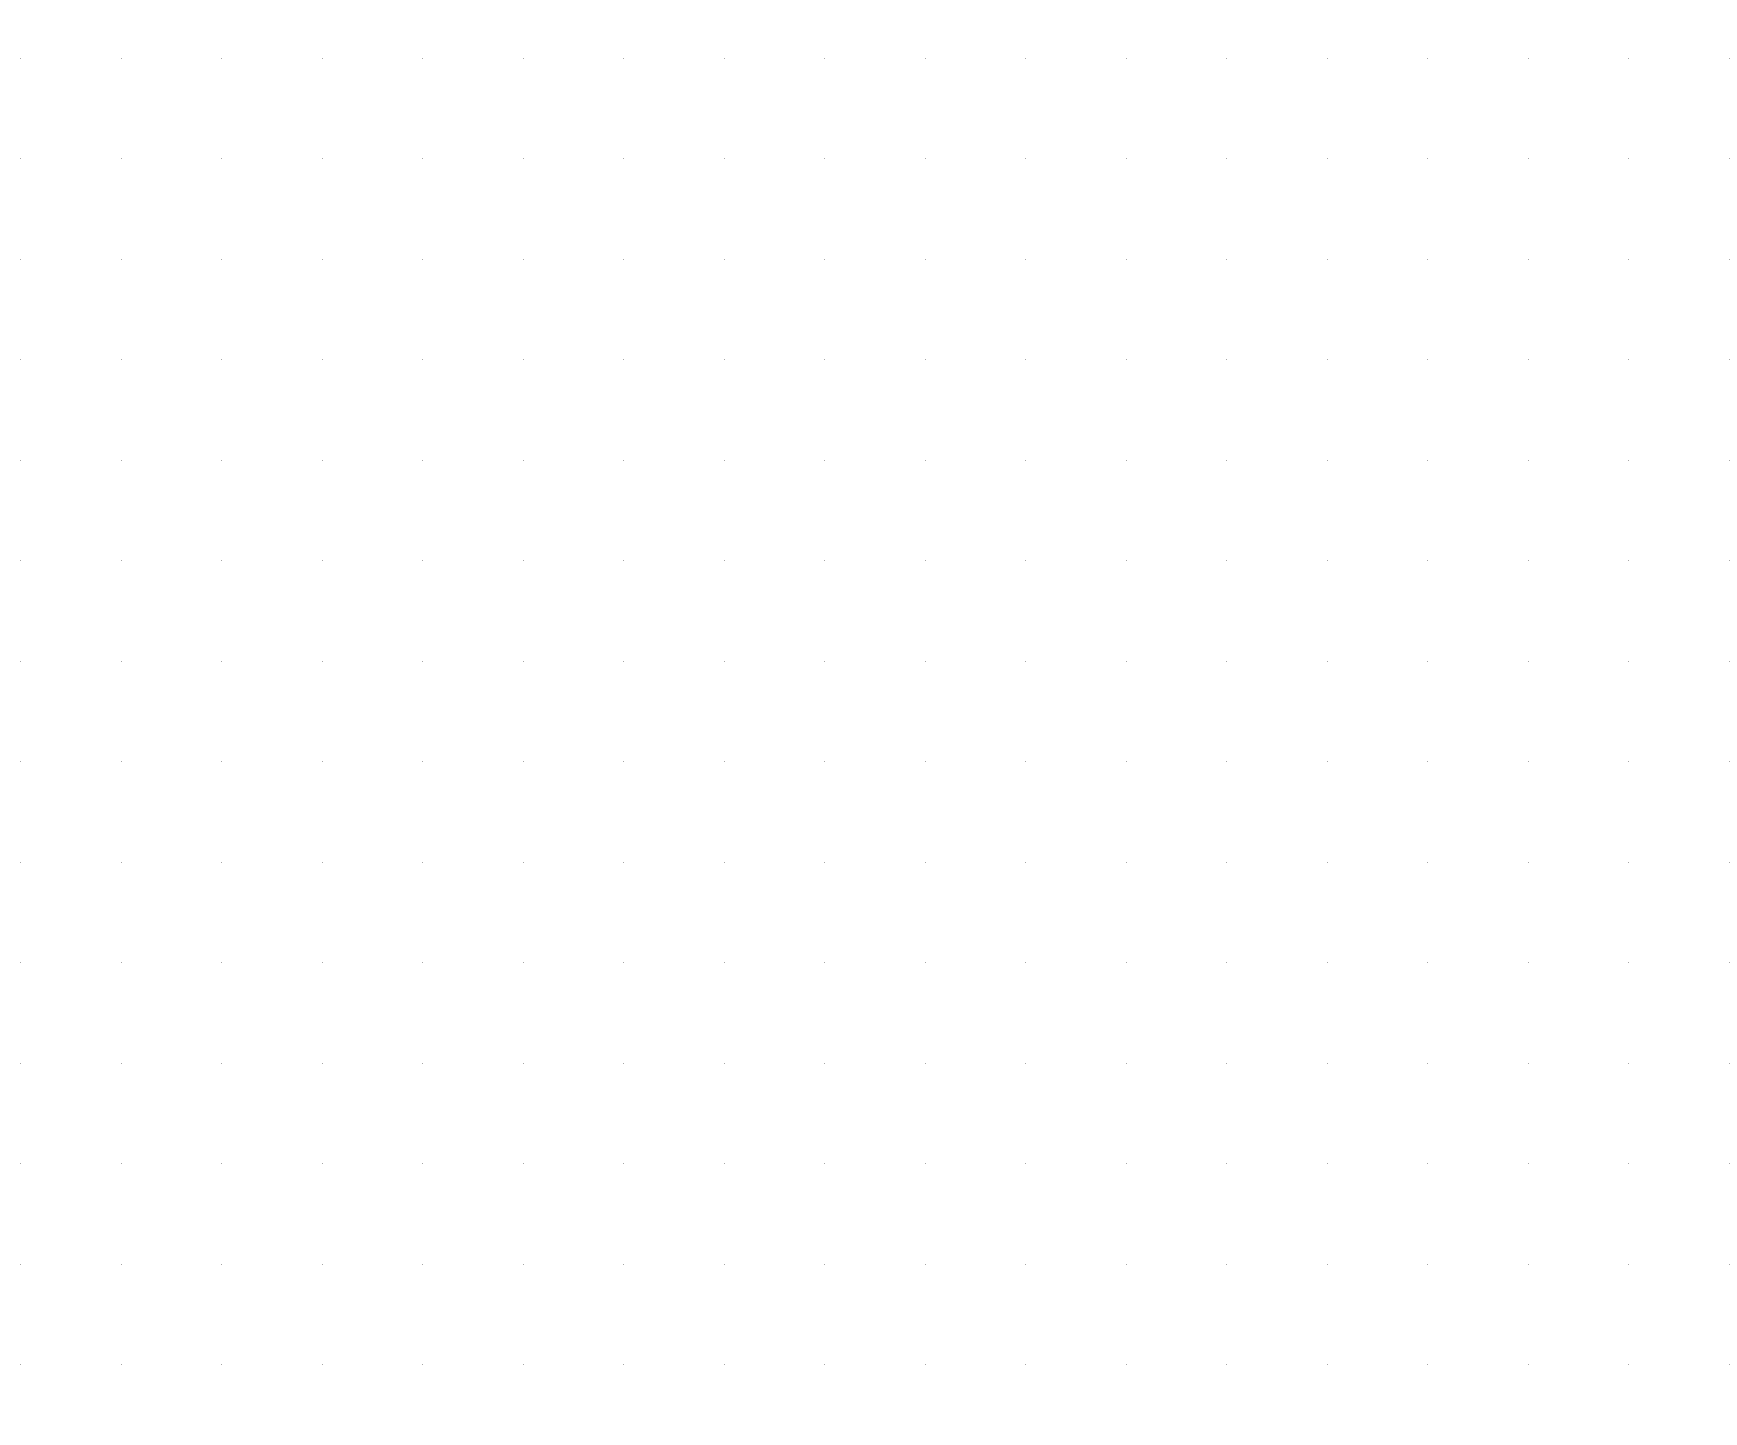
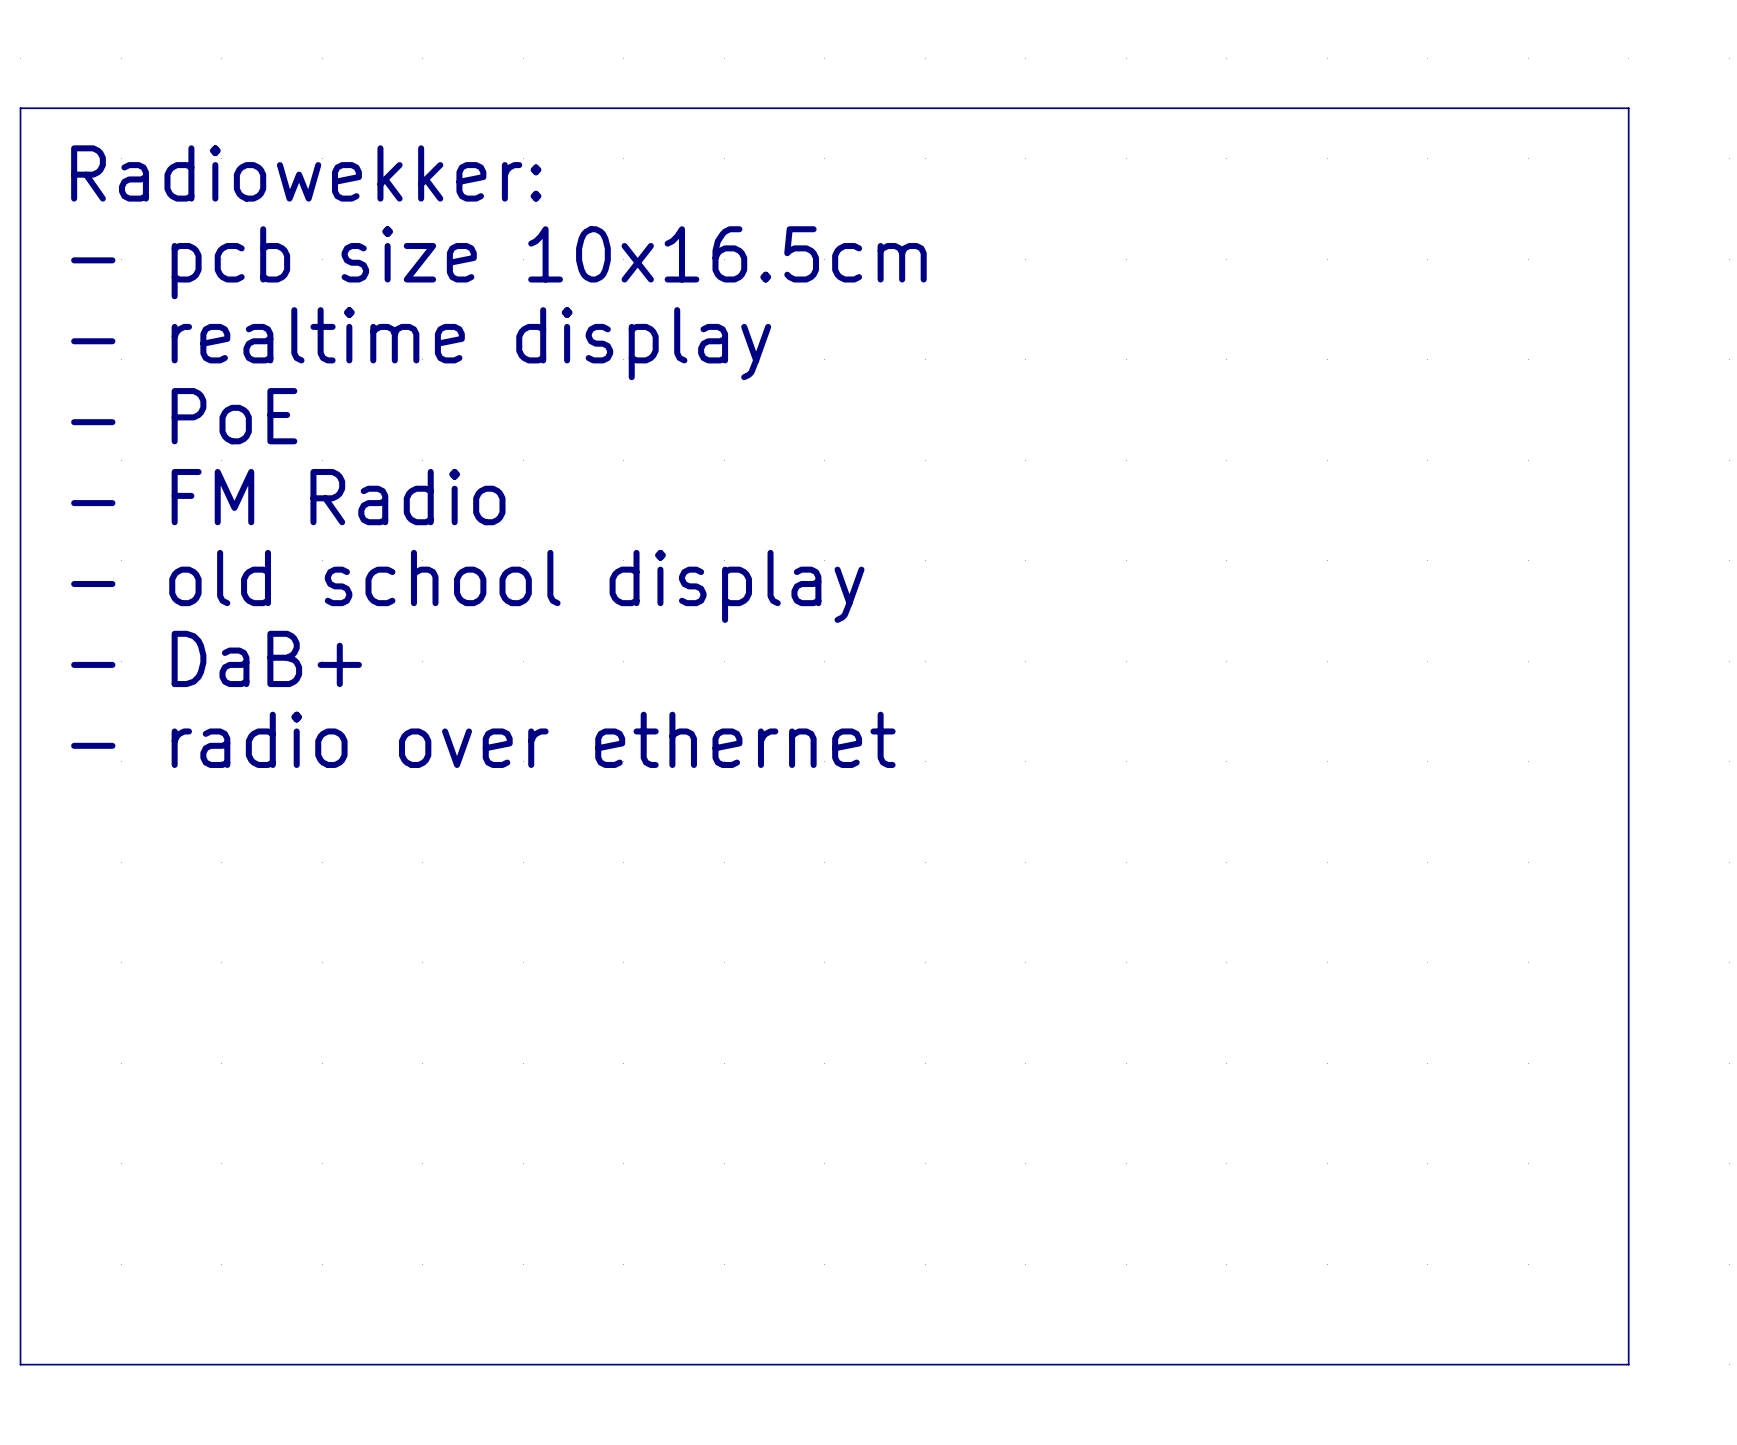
line: none -> (20, 108) (1628, 108) (1628, 1364) (20, 1364) (20, 108)
text: none -> Radiowekker: (306, 173)
text: none -> - pcb size 10x16.5cm (498, 262)
text: none -> - realtime display (421, 343)
text: none -> - PoE (184, 416)
text: none -> - FM Radio (288, 497)
text: none -> - old school display (467, 586)
text: none -> - DaB+ (216, 658)
text: none -> - radio over ethernet (483, 739)

